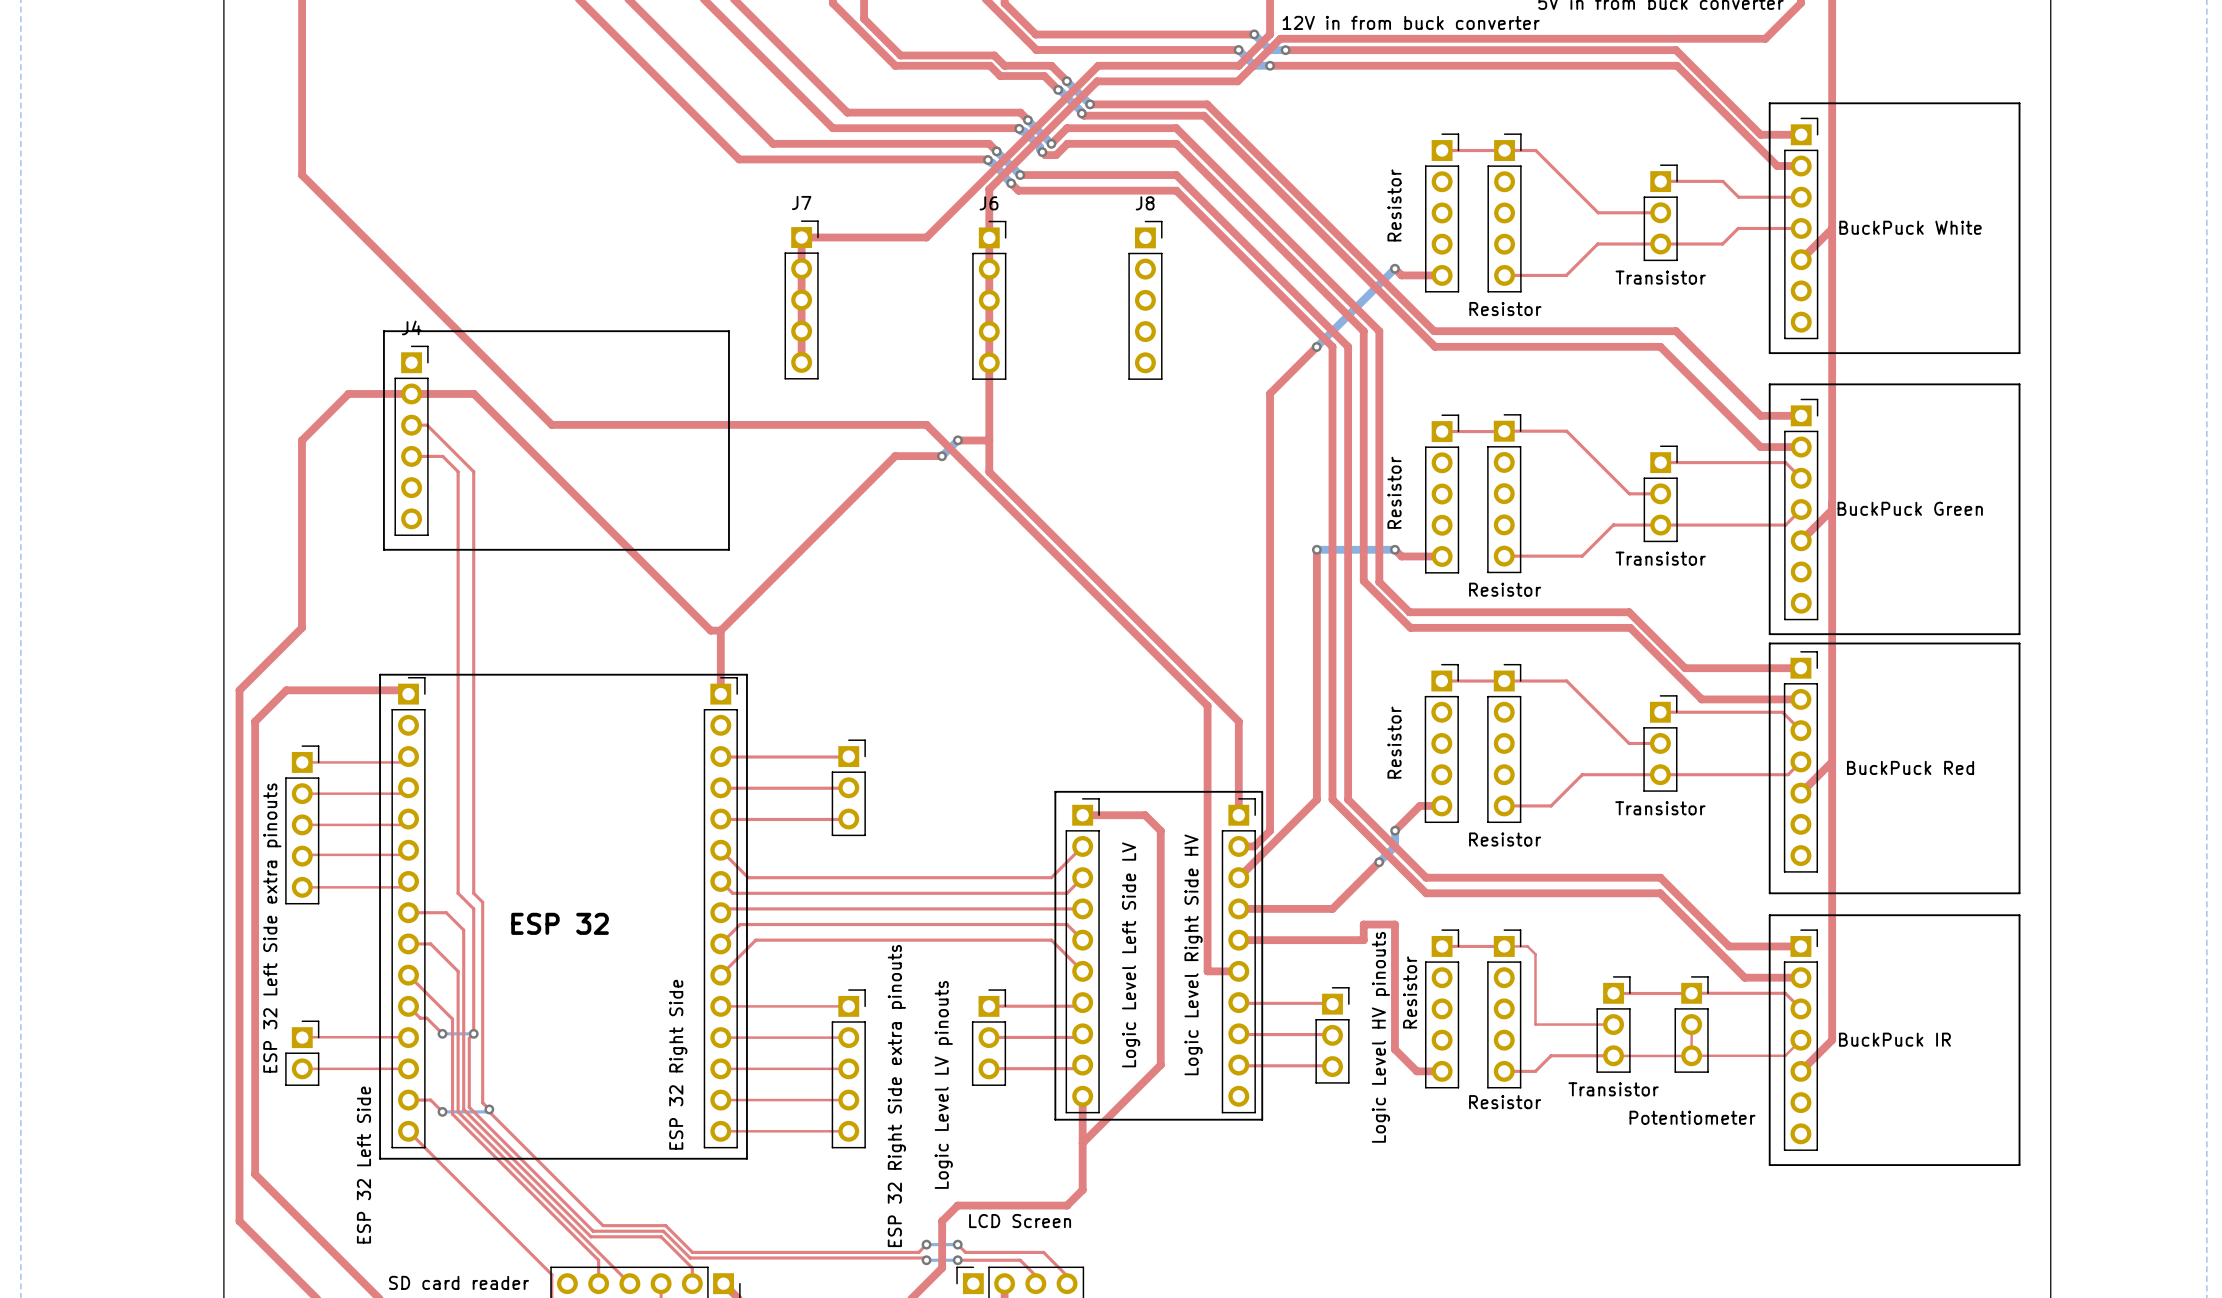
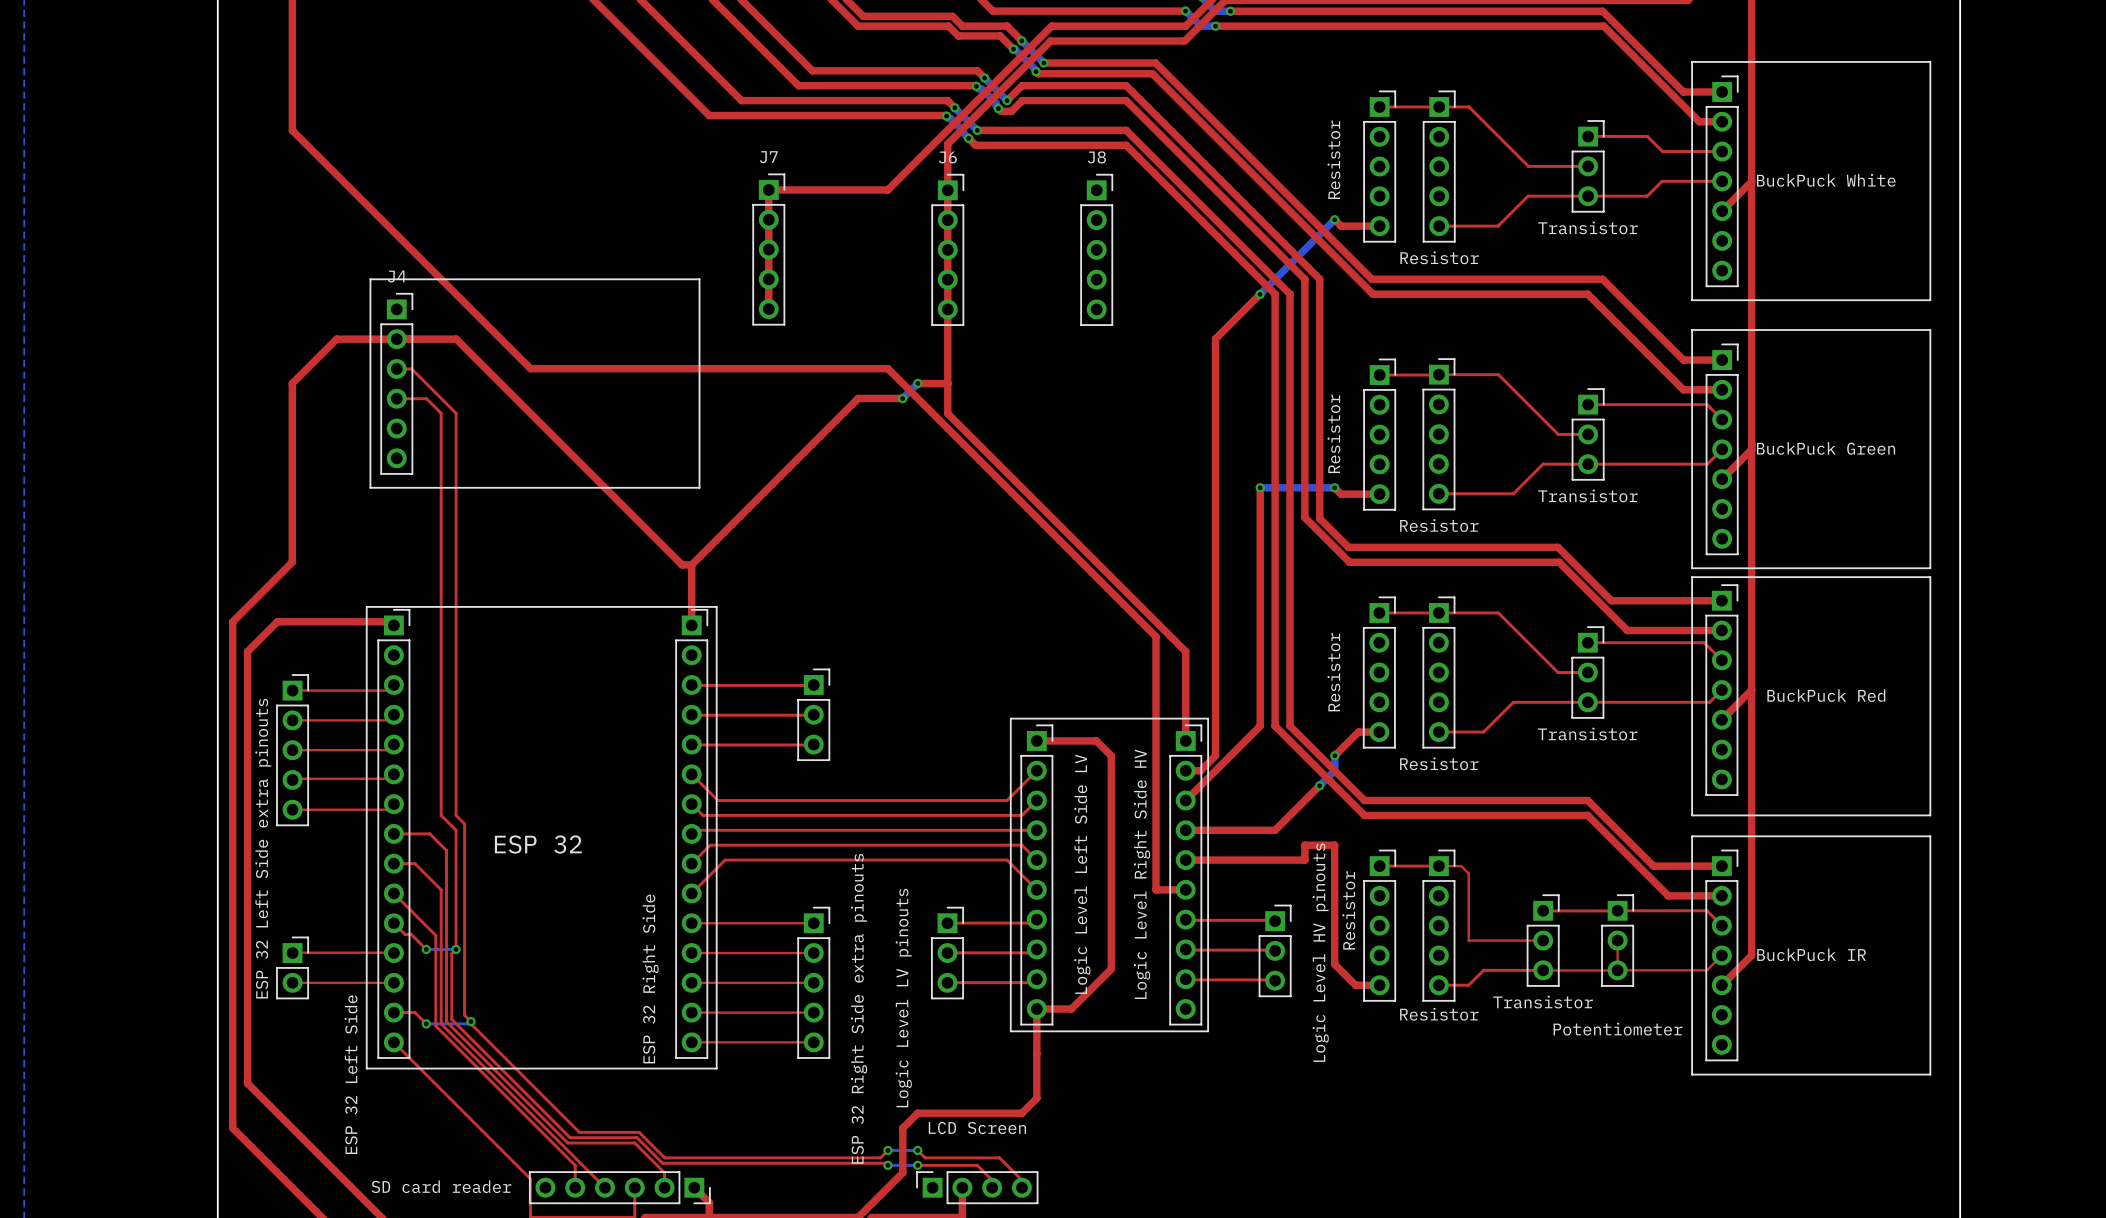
top track: (1160, 1054) (1160, 1065) (1082, 1143) -> (1111, 969) (1071, 1009) (1036, 1009)

